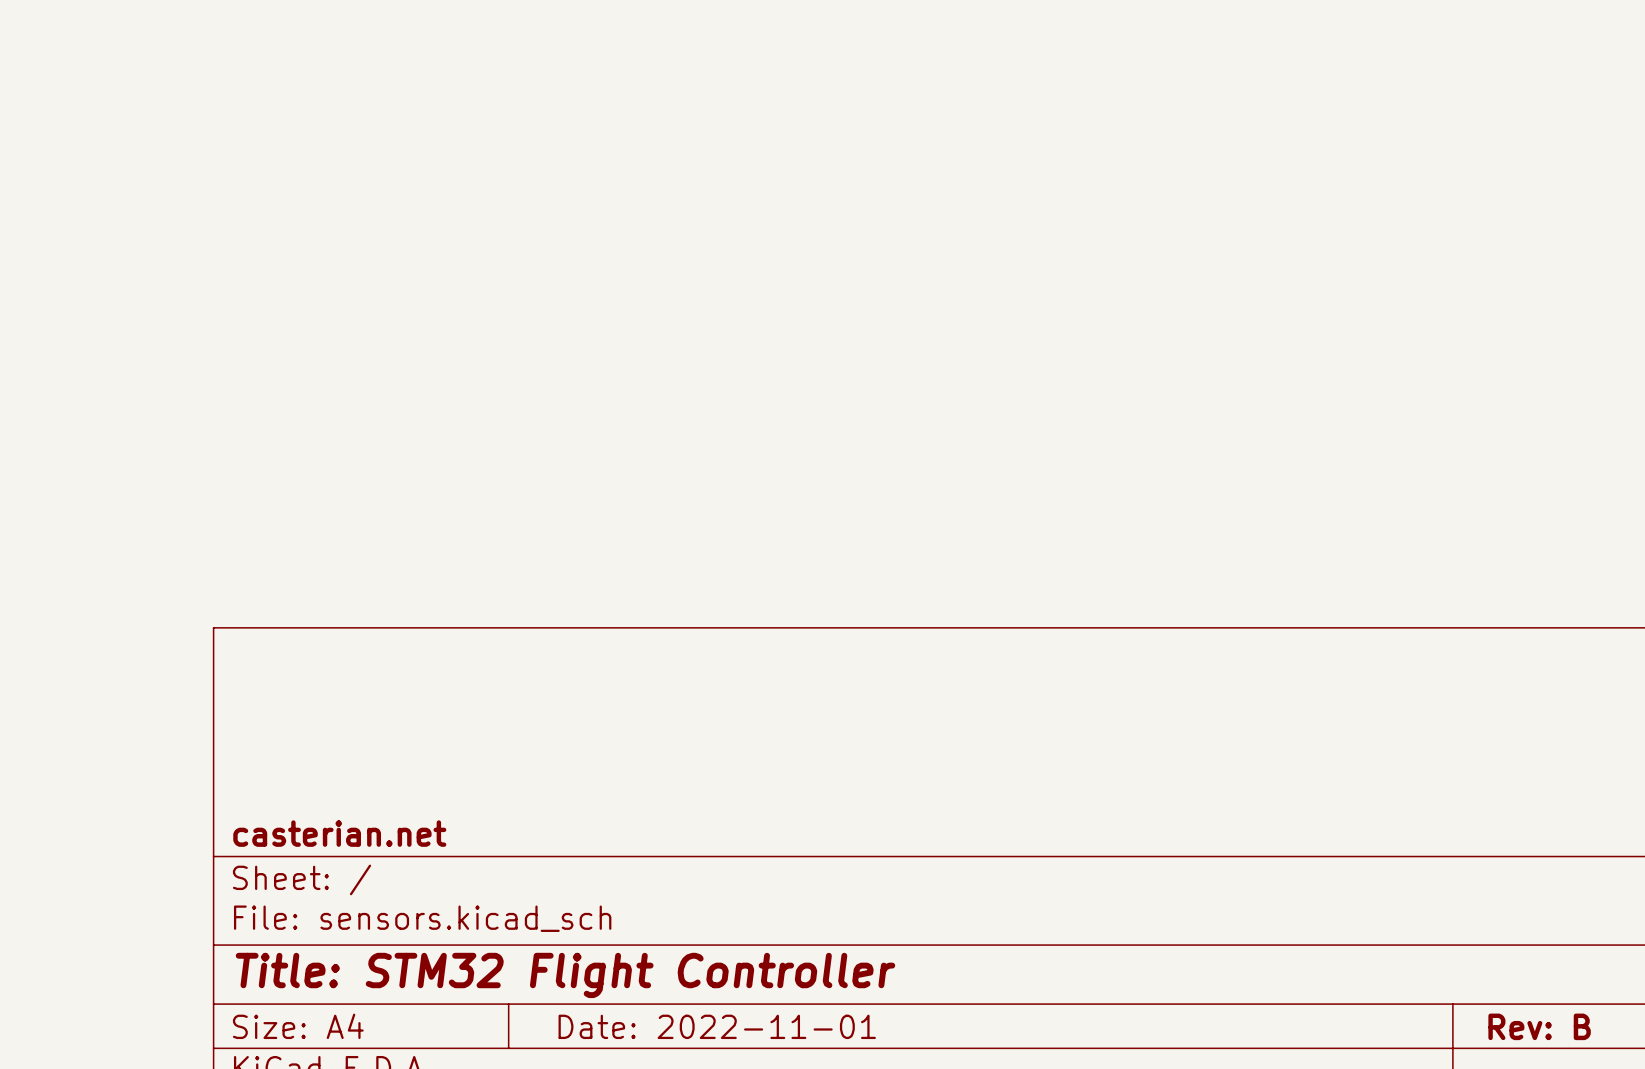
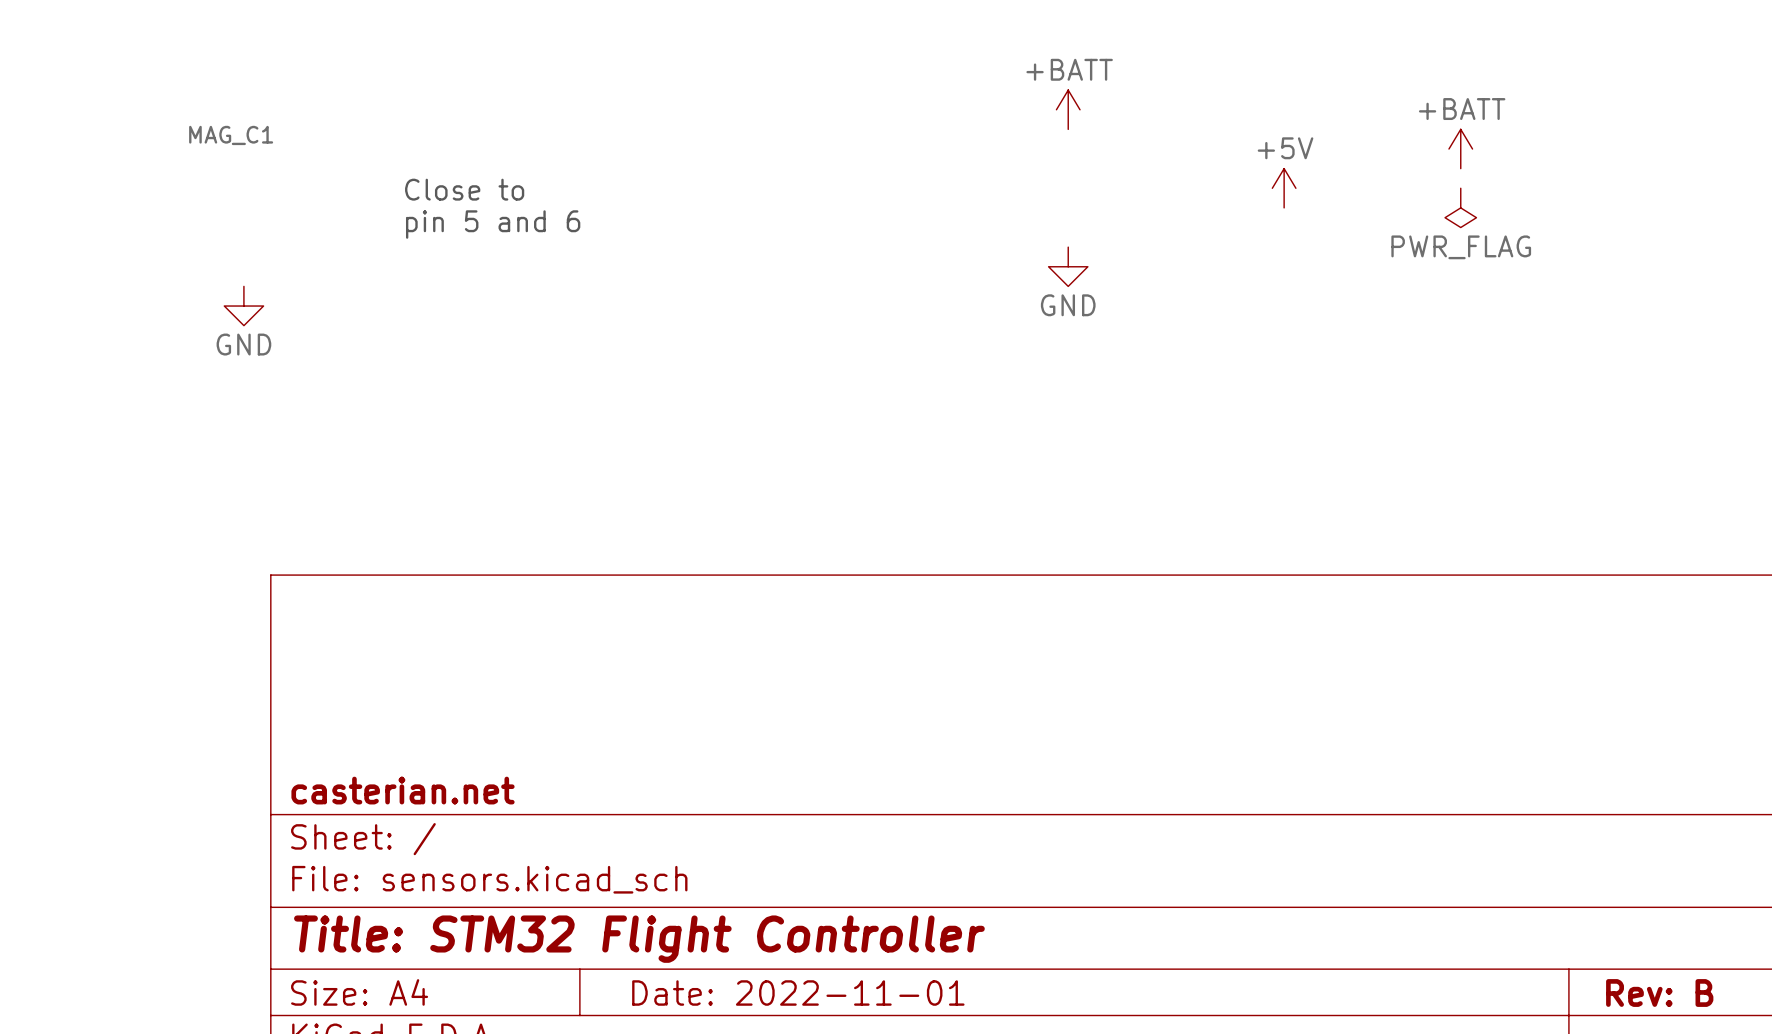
power symbol: none -> +BATT (1068, 109)
label: none -> MAG_C1 (231, 135)
power symbol: none -> +BATT (1460, 149)
power symbol: none -> +5V (1284, 188)
text: none -> Close to (464, 189)
power symbol: none -> PWR_FLAG (1460, 207)
text: none -> pin 5 and 6 (493, 224)
power symbol: none -> GND (1068, 266)
power symbol: none -> GND (243, 306)

